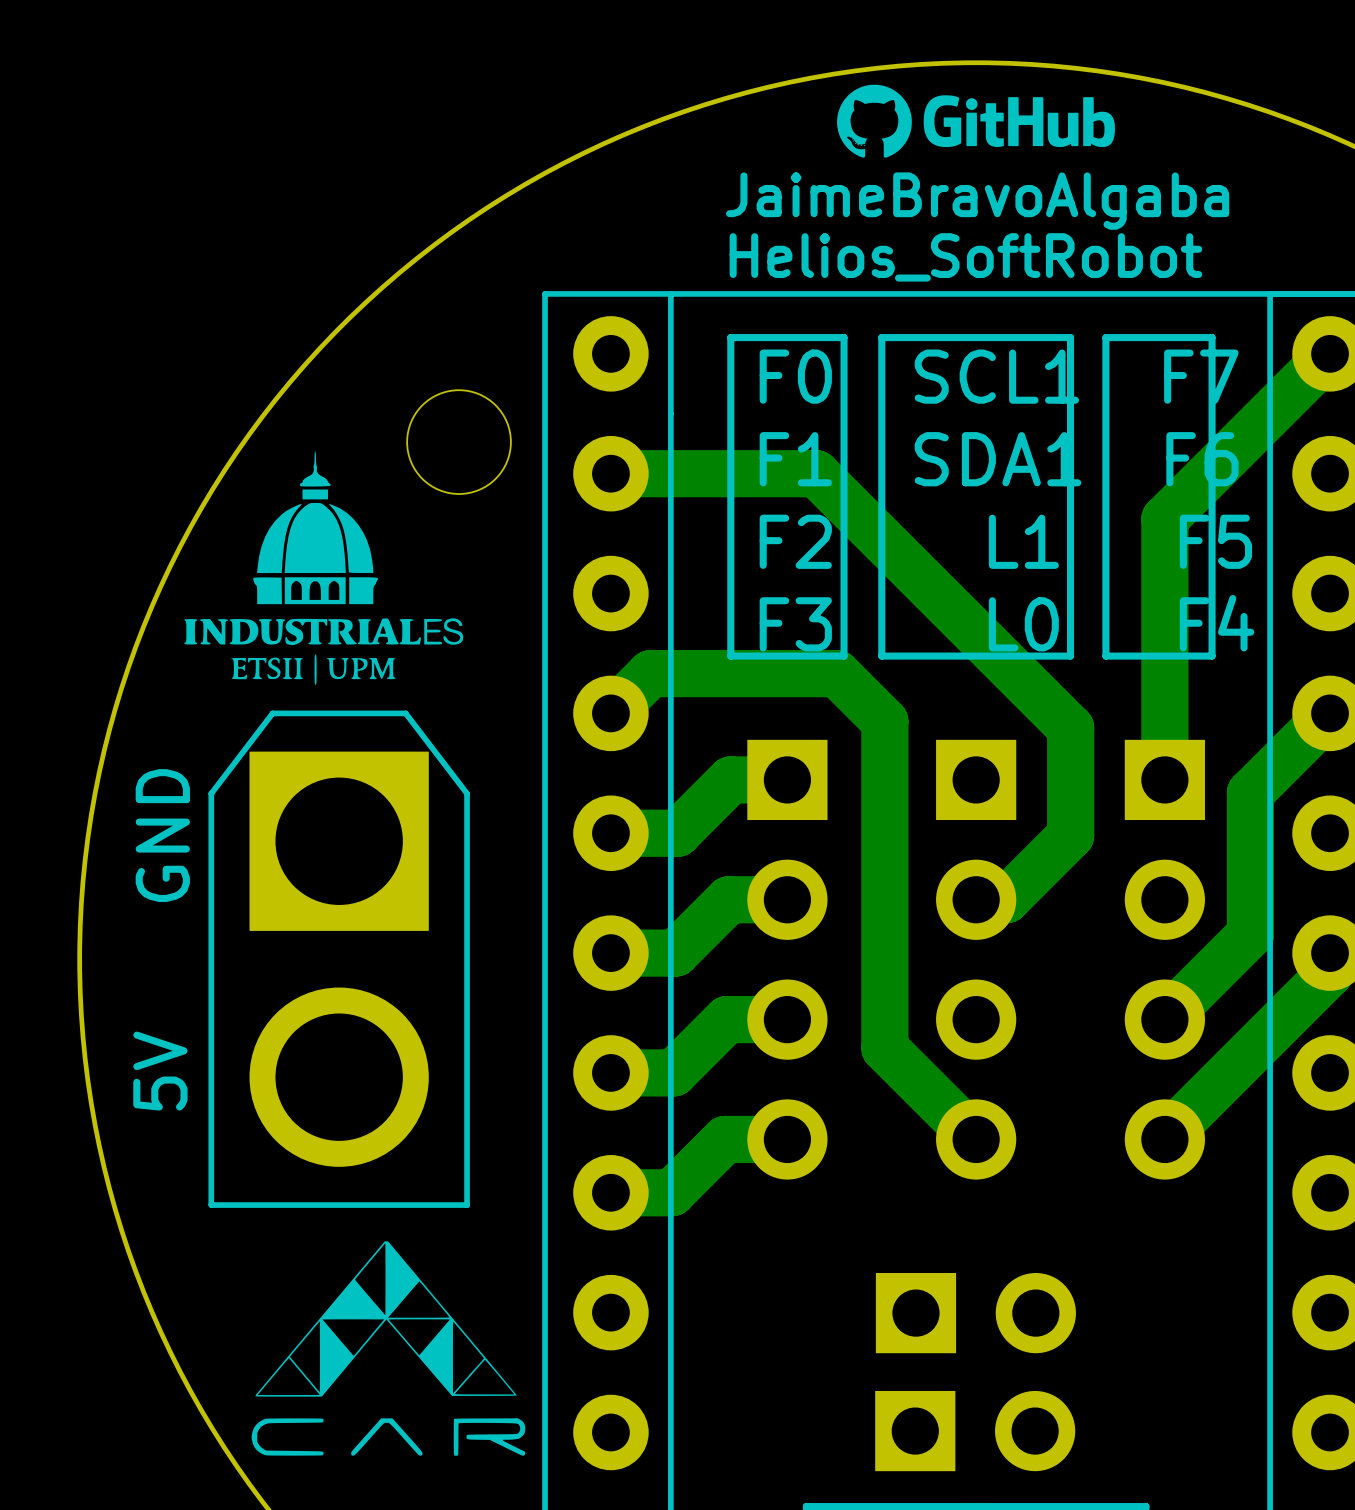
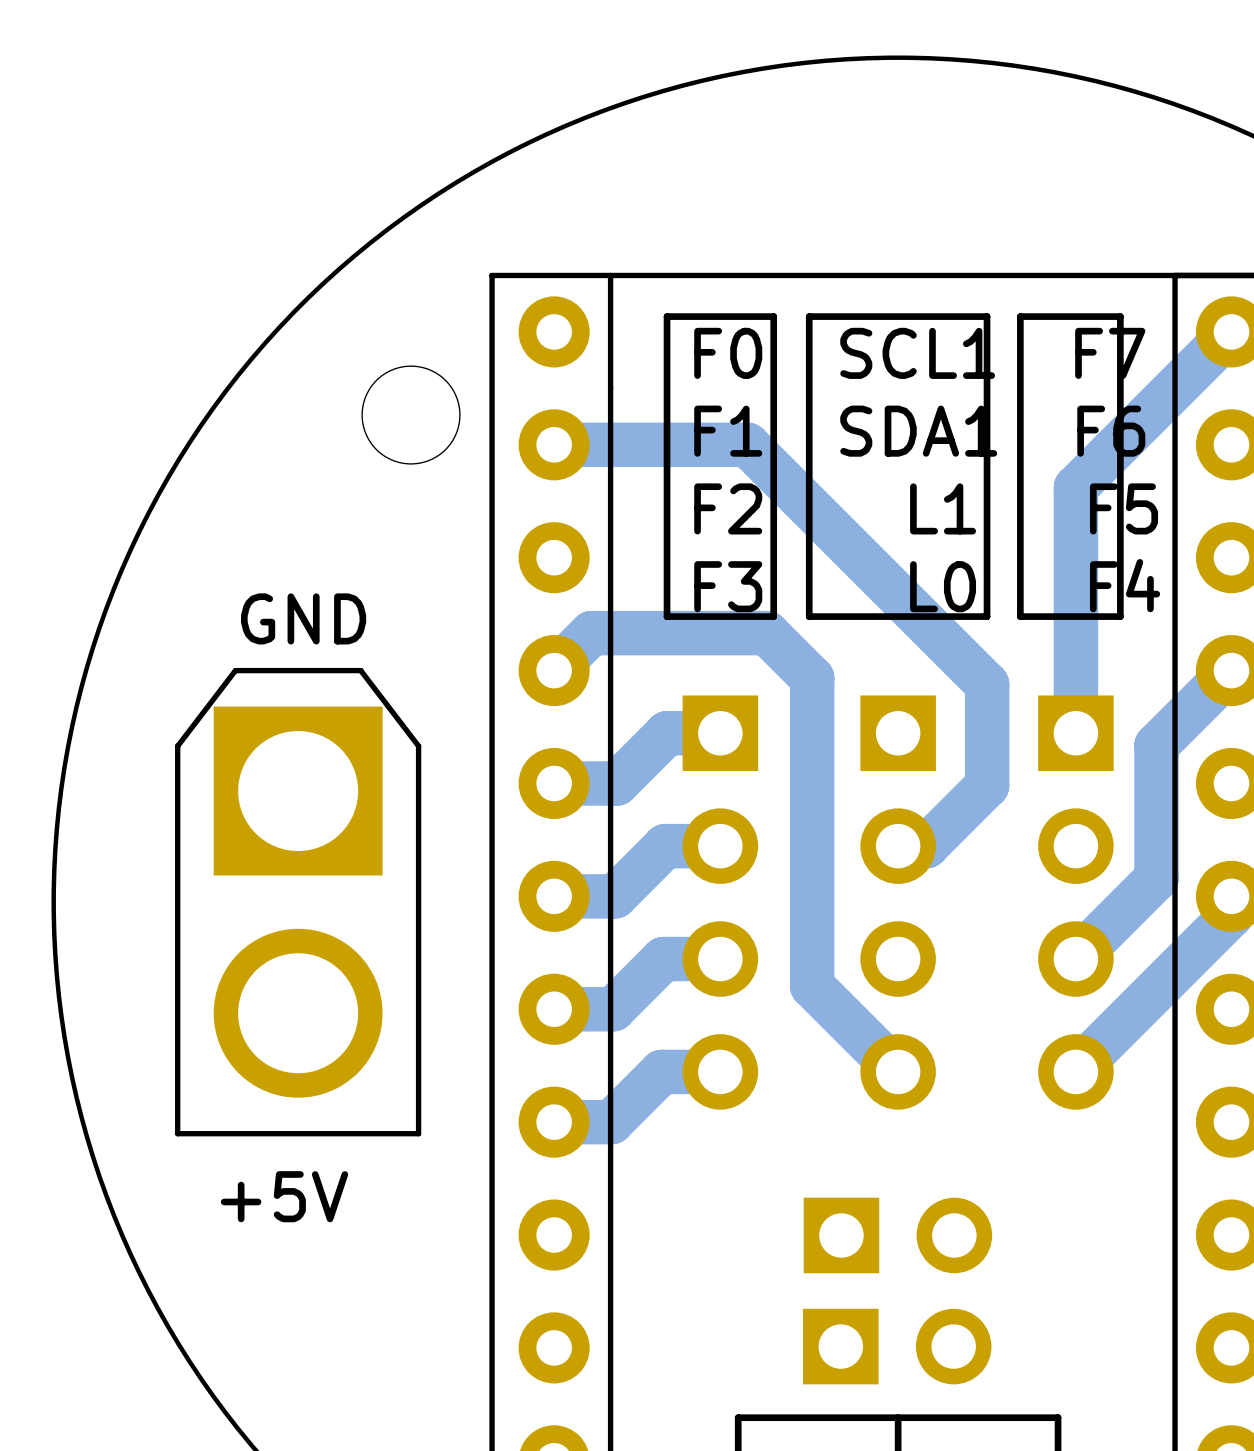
drawing: [837, 84, 1115, 158] -> none
text: JaimeBravoAlgaba (977, 201) -> none
text: Helios_SoftRobot (965, 257) -> none
drawing: [184, 451, 464, 685] -> none
text rotation: 0° (162, 835) -> 90° clockwise (303, 618)
text position: GND (162, 835) -> GND (303, 618)
text: 5V (160, 1071) -> none
drawing: [251, 1241, 526, 1456] -> none
text: none -> +5V (284, 1196)

